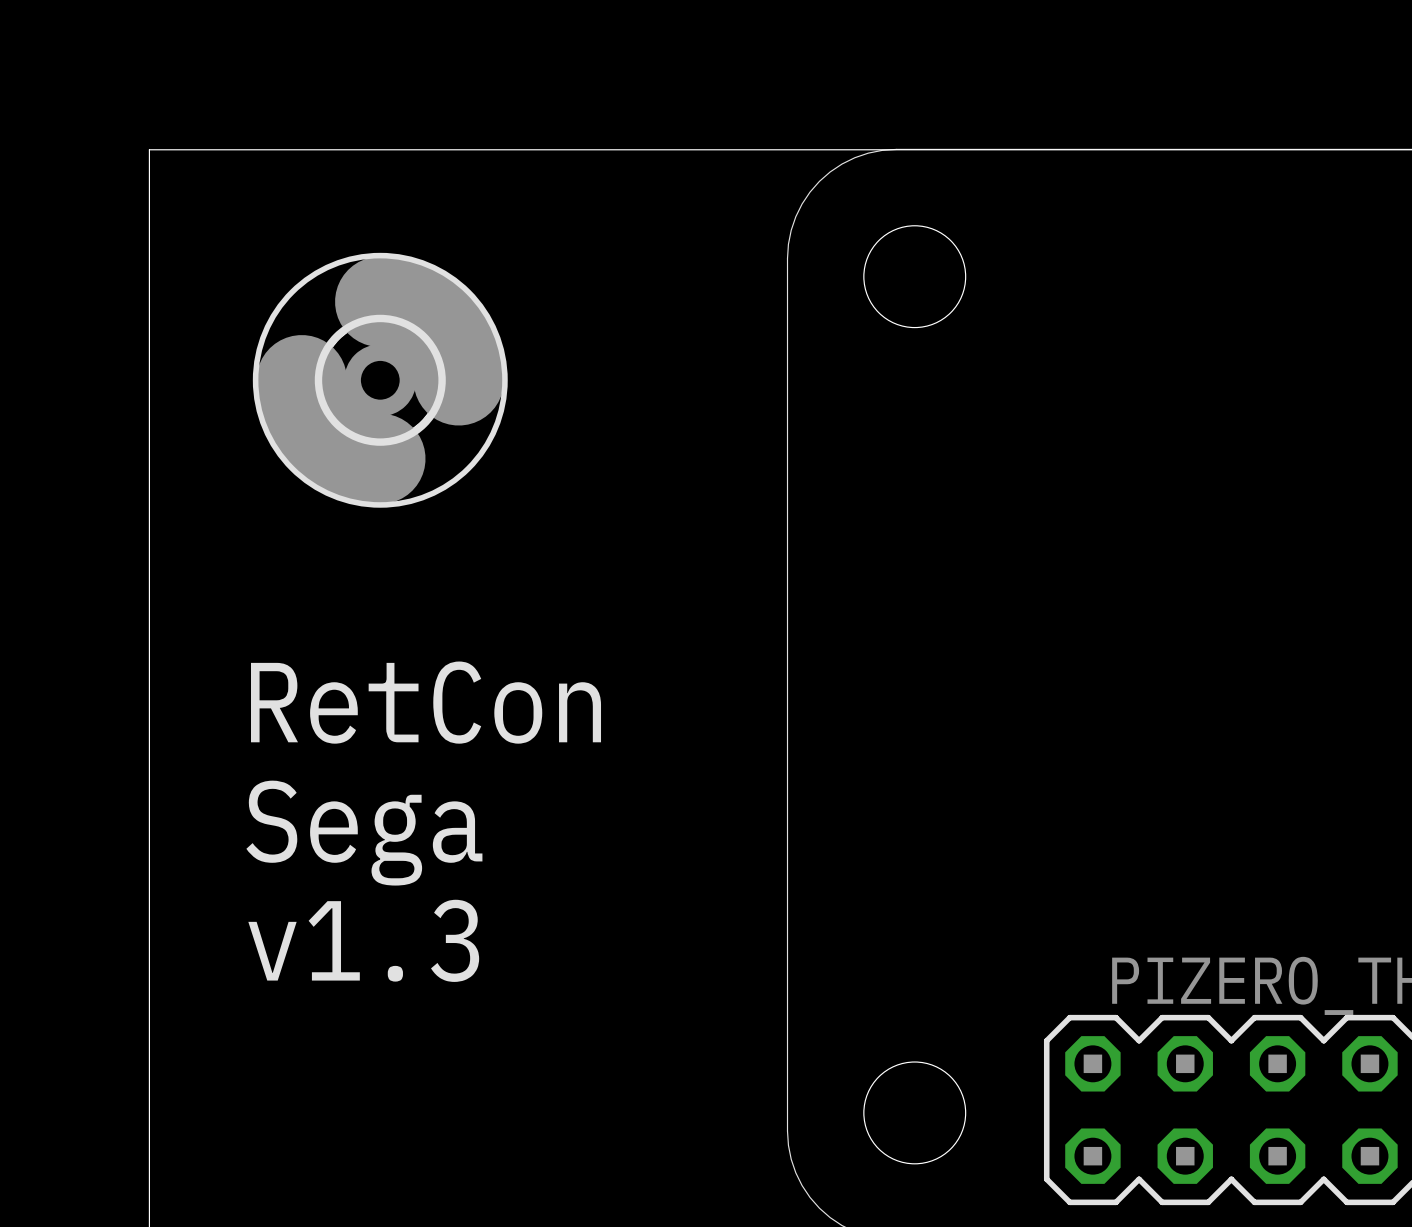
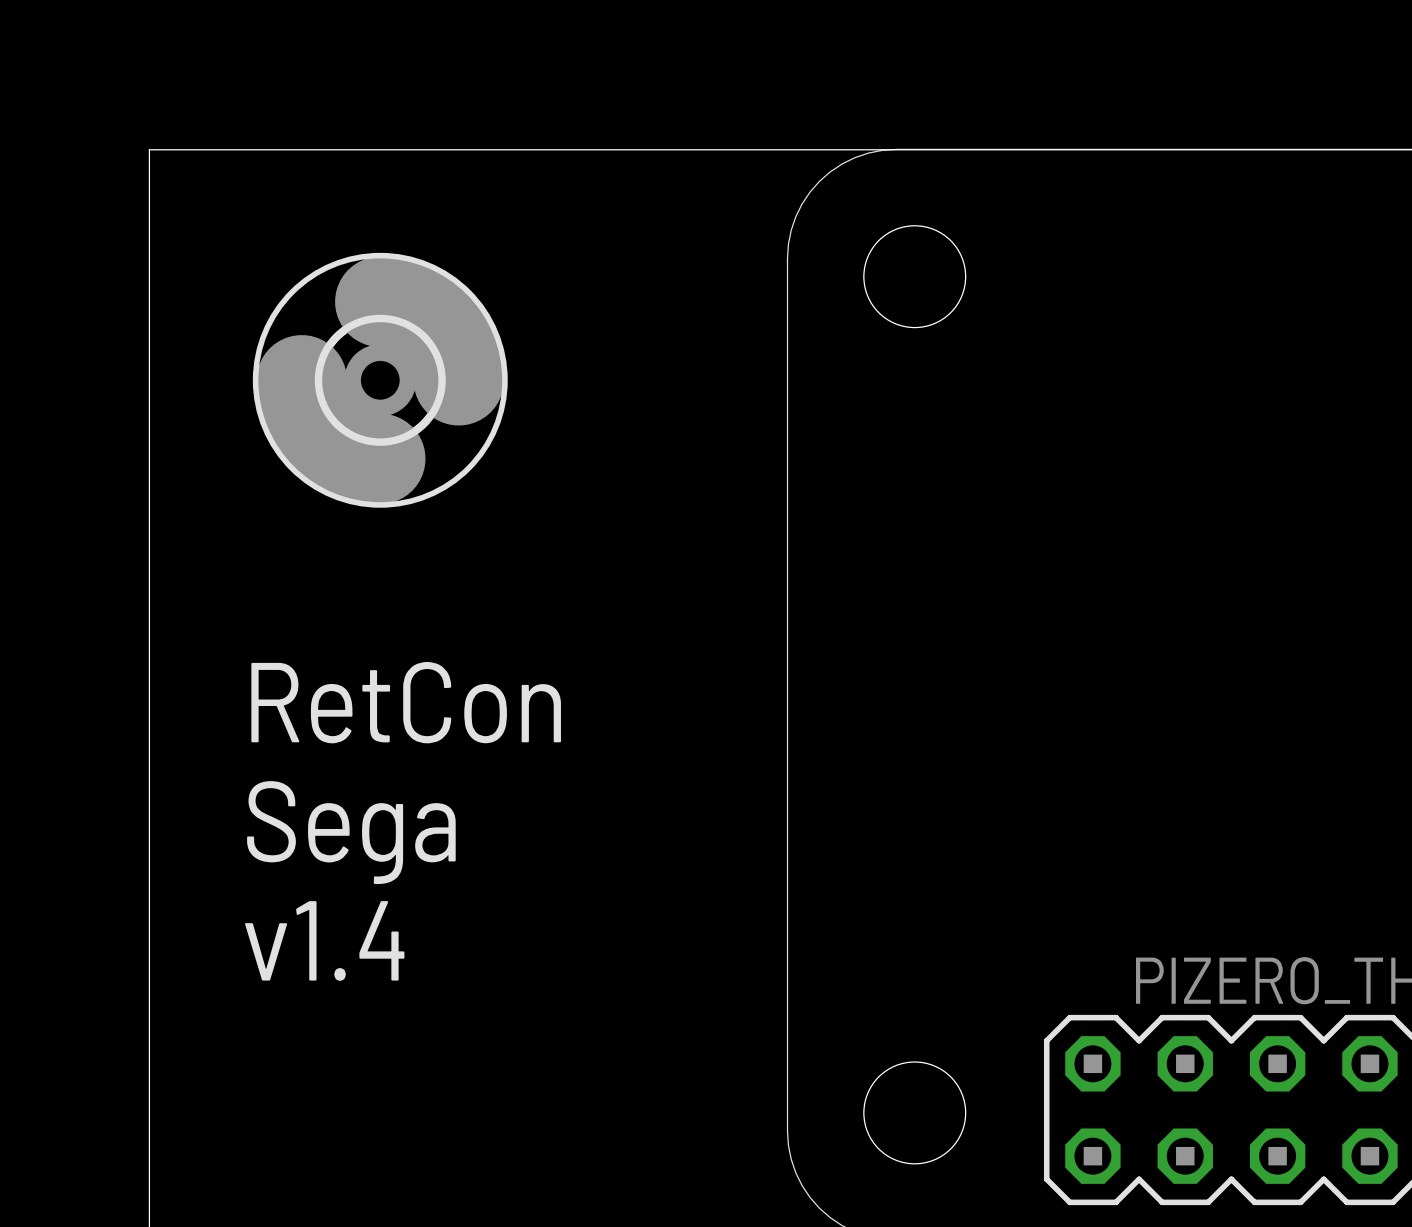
text: v1.3 (363, 940) -> v1.4 (324, 940)

